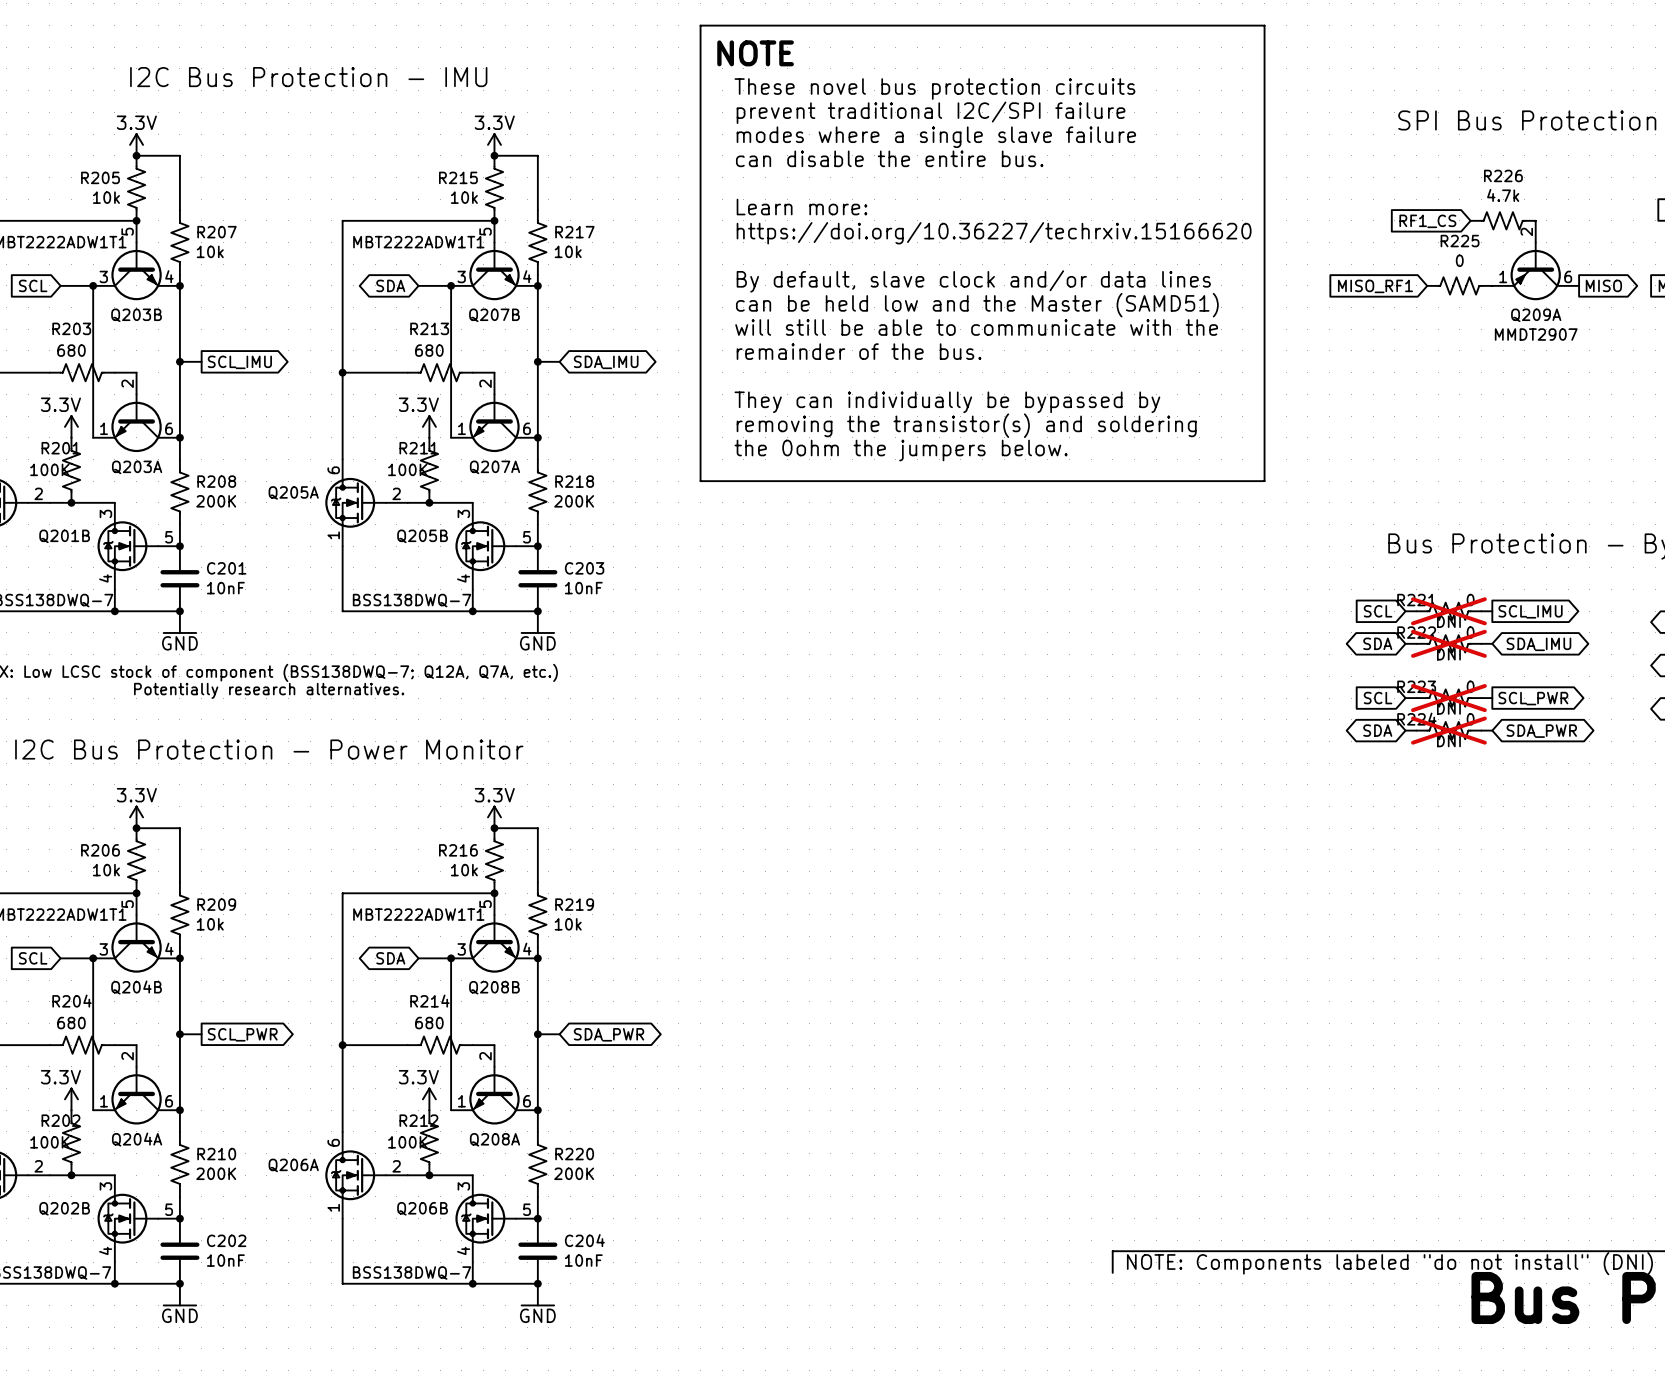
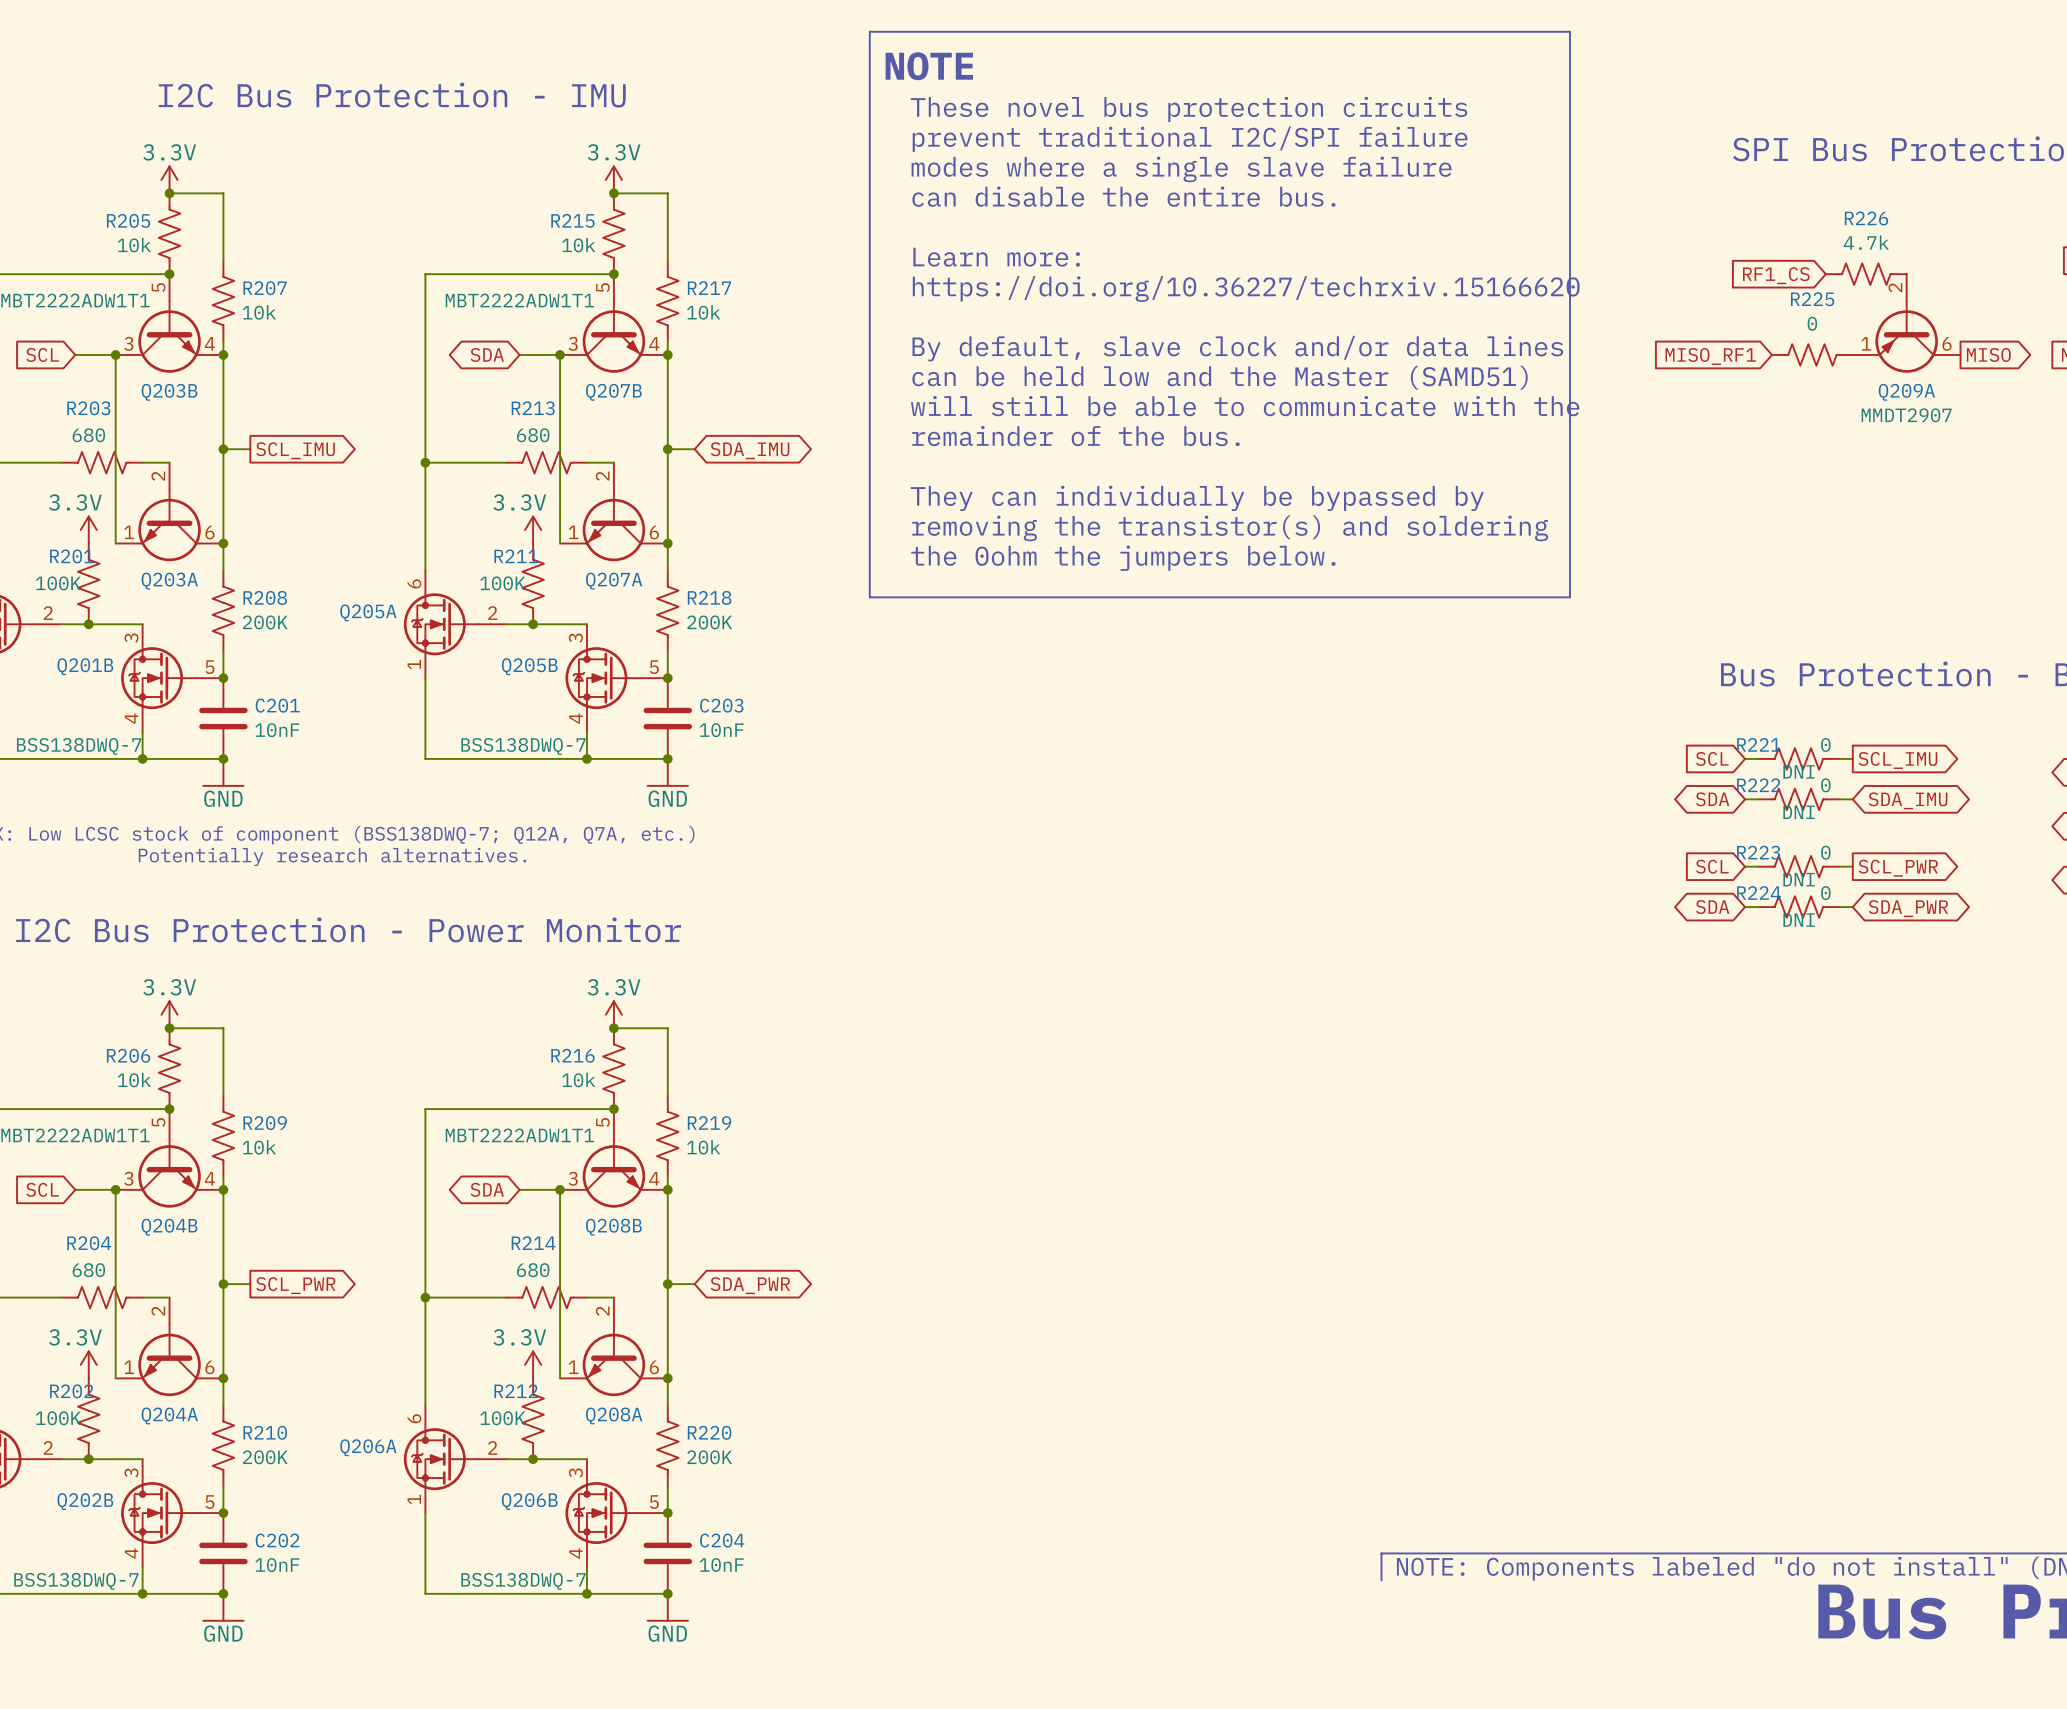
R221 do-not-place cross: (1448, 611) -> none
R222 do-not-place cross: (1448, 643) -> none
R223 do-not-place cross: (1448, 698) -> none
R224 do-not-place cross: (1448, 730) -> none

